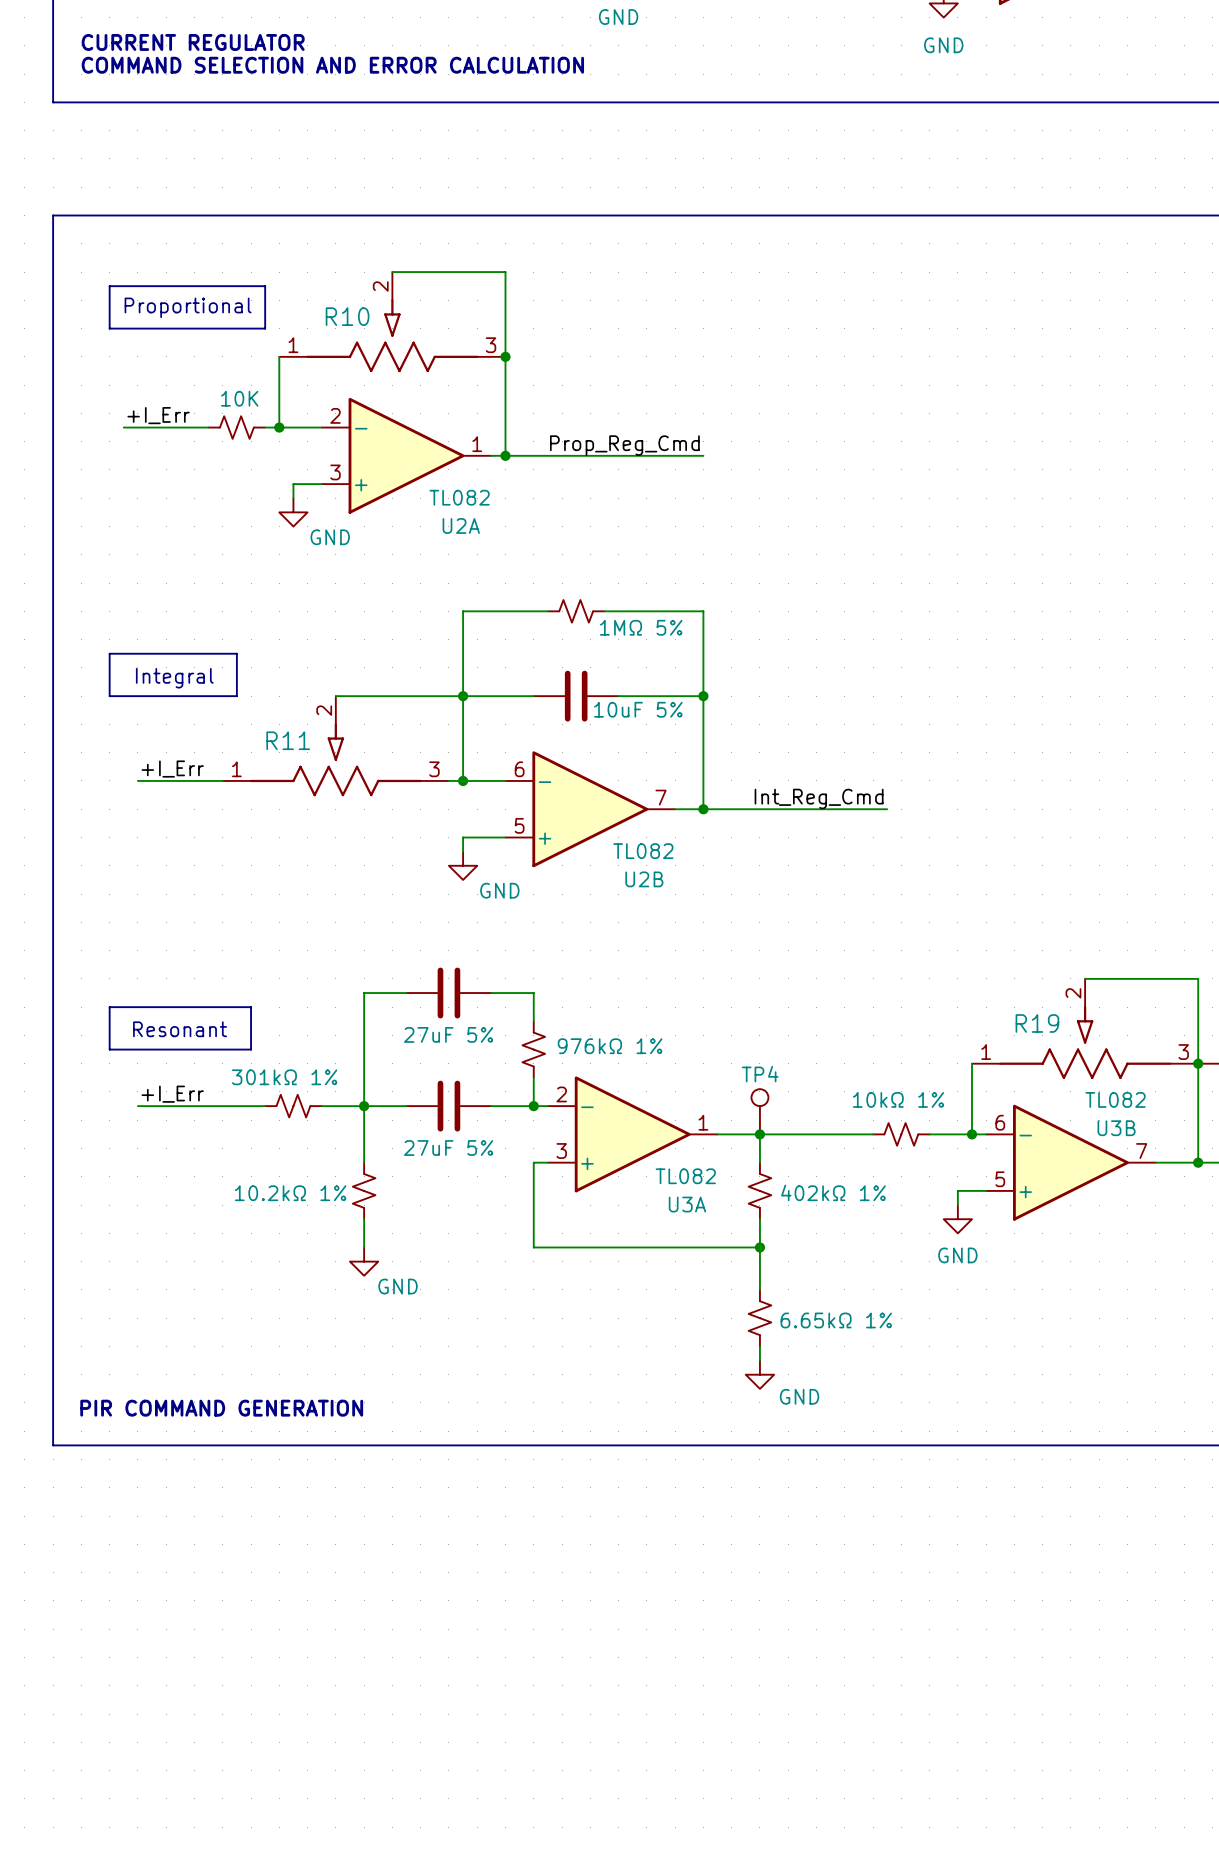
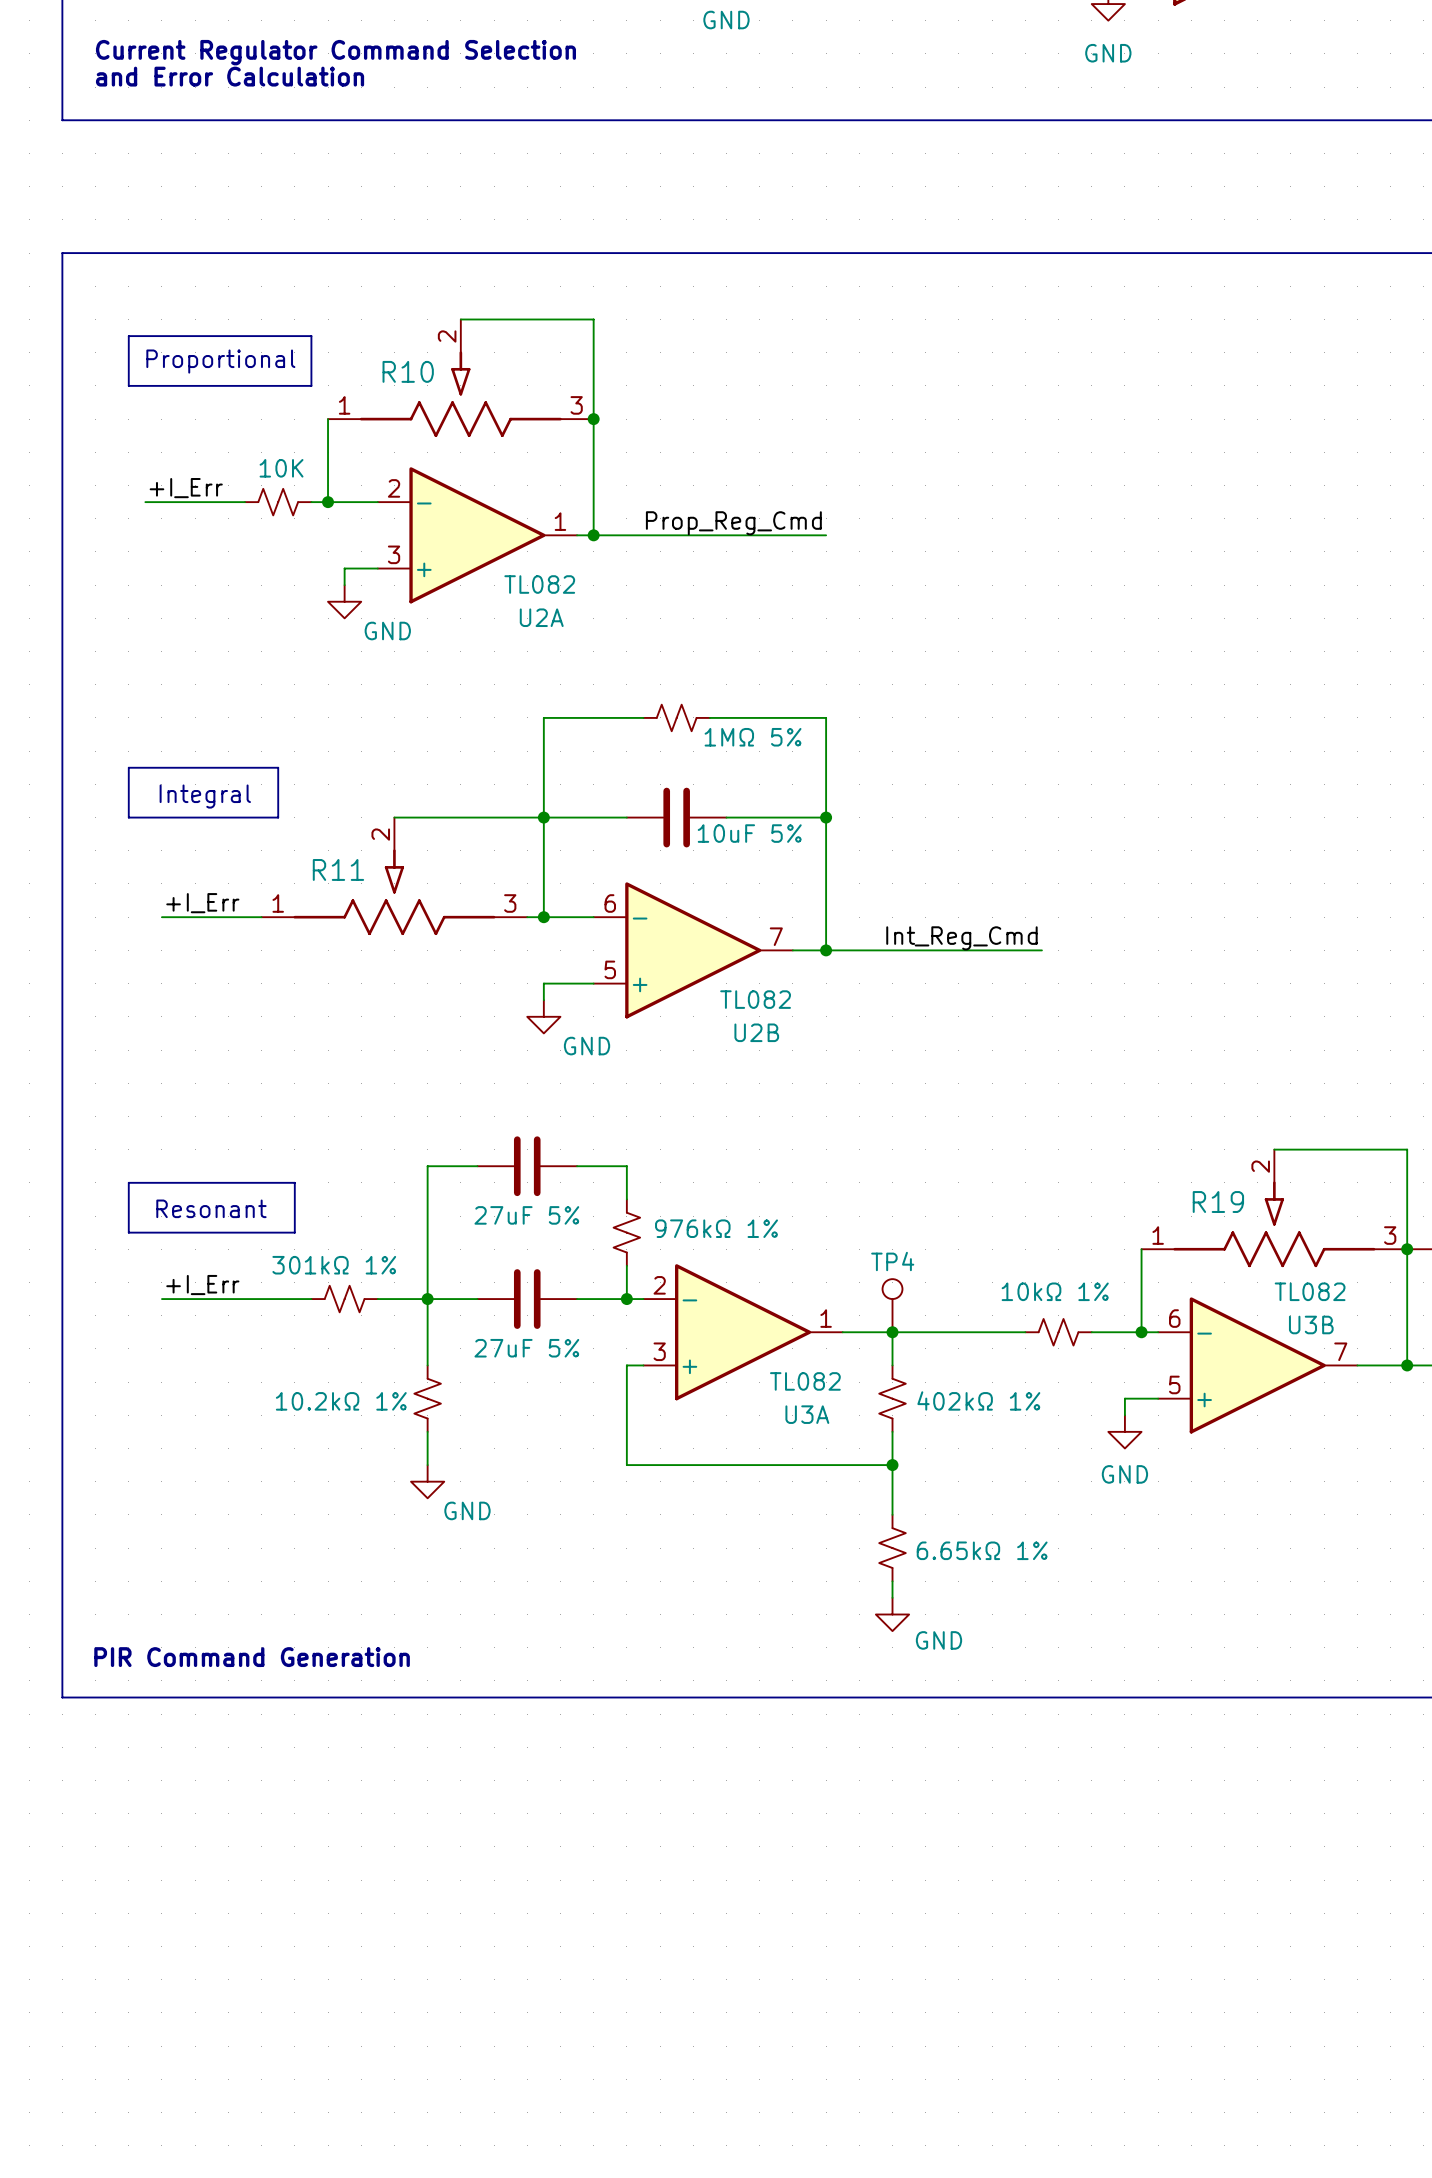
text: CURRENT REGULATOR (193, 42) -> Current Regulator Command Selection (335, 52)
text: COMMAND SELECTION AND ERROR CALCULATION (332, 65) -> and Error Calculation (230, 76)
text: PIR COMMAND GENERATION (221, 1408) -> none
text: none -> PIR Command Generation (252, 1657)

